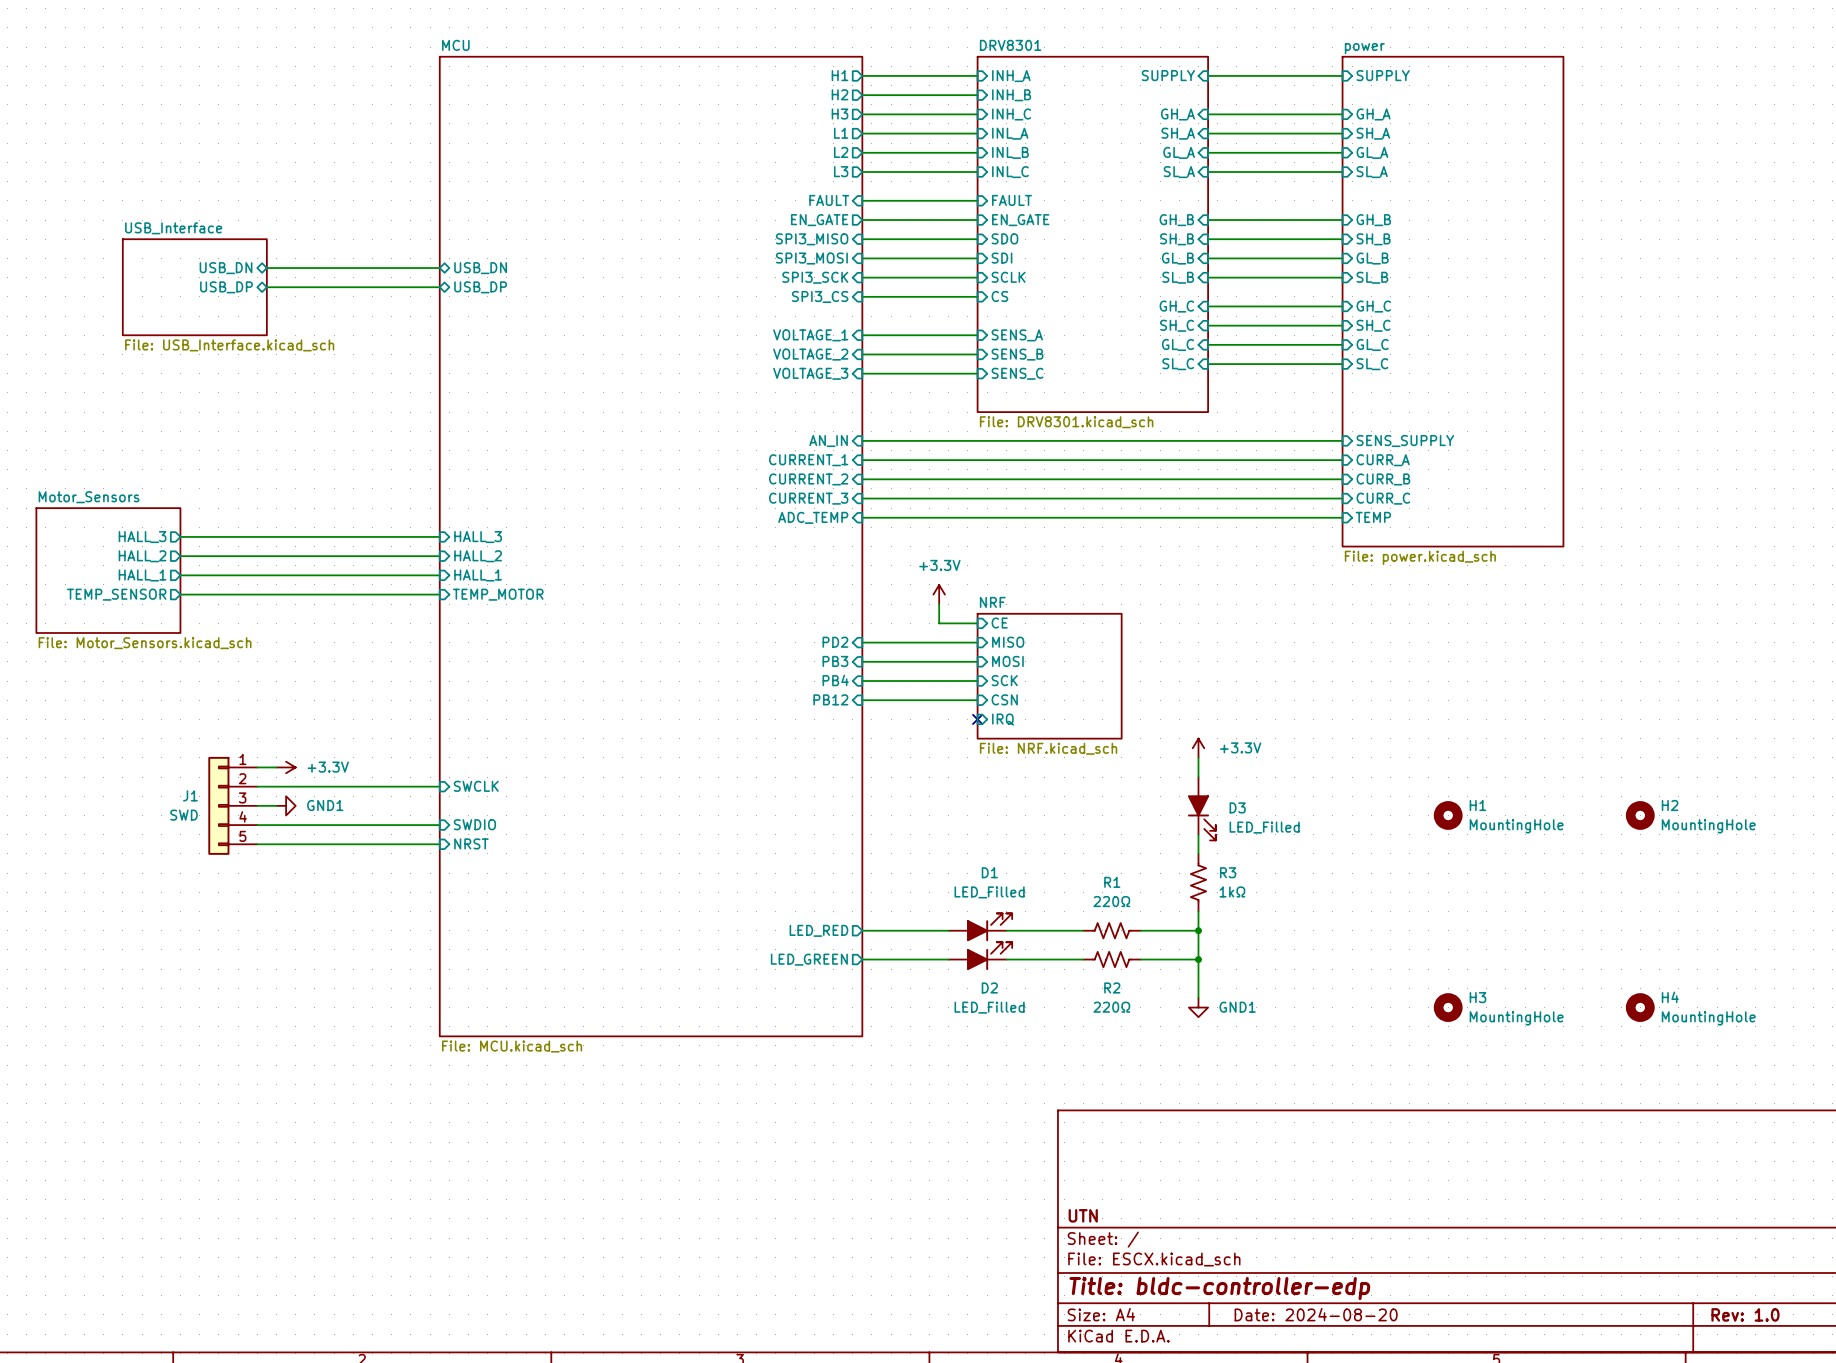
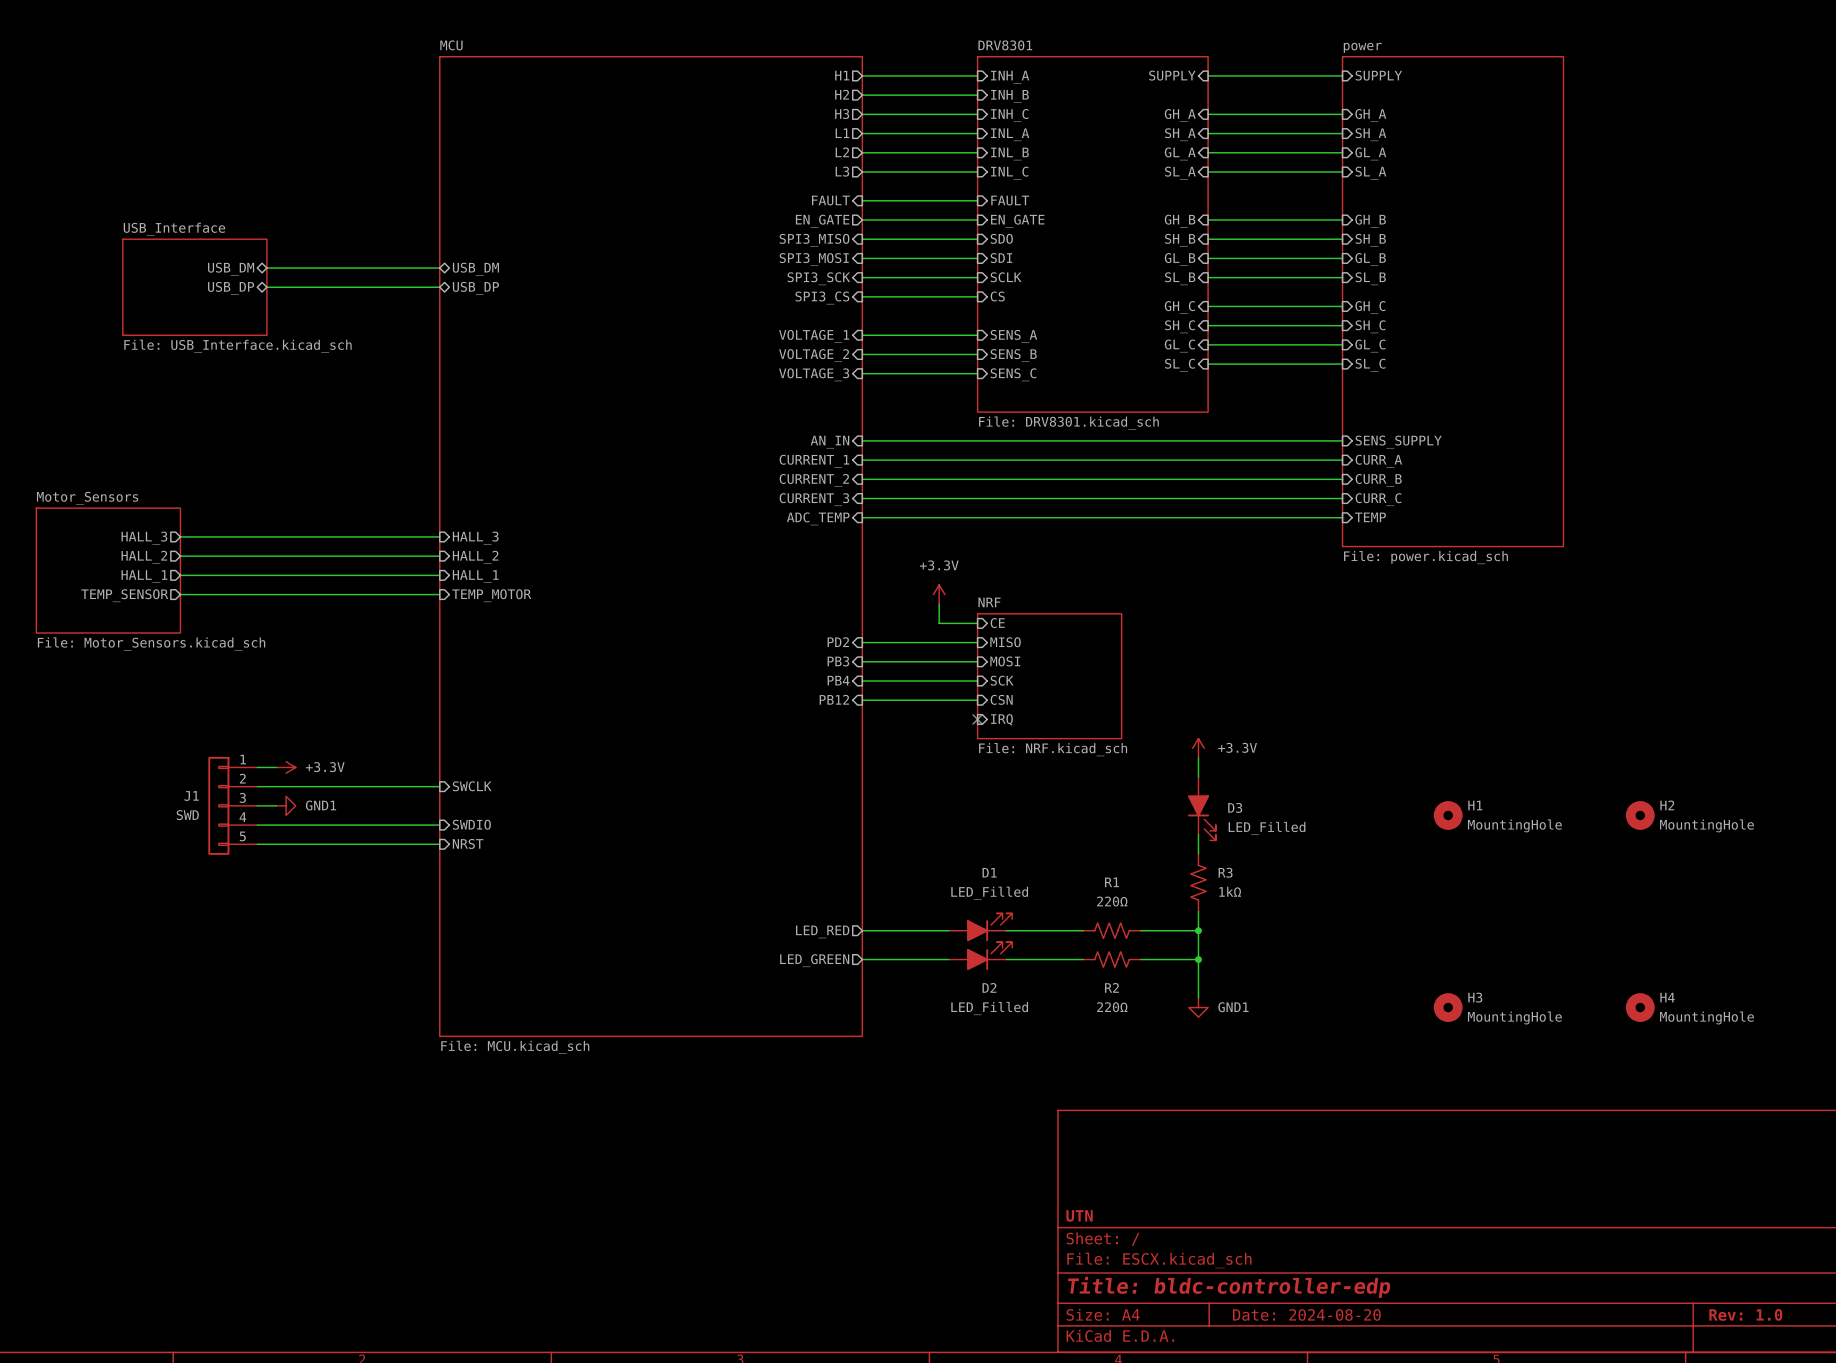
sheet pin: USB_DN (226, 268) -> USB_DM (231, 269)
sheet pin: USB_DN (480, 268) -> USB_DM (475, 269)

